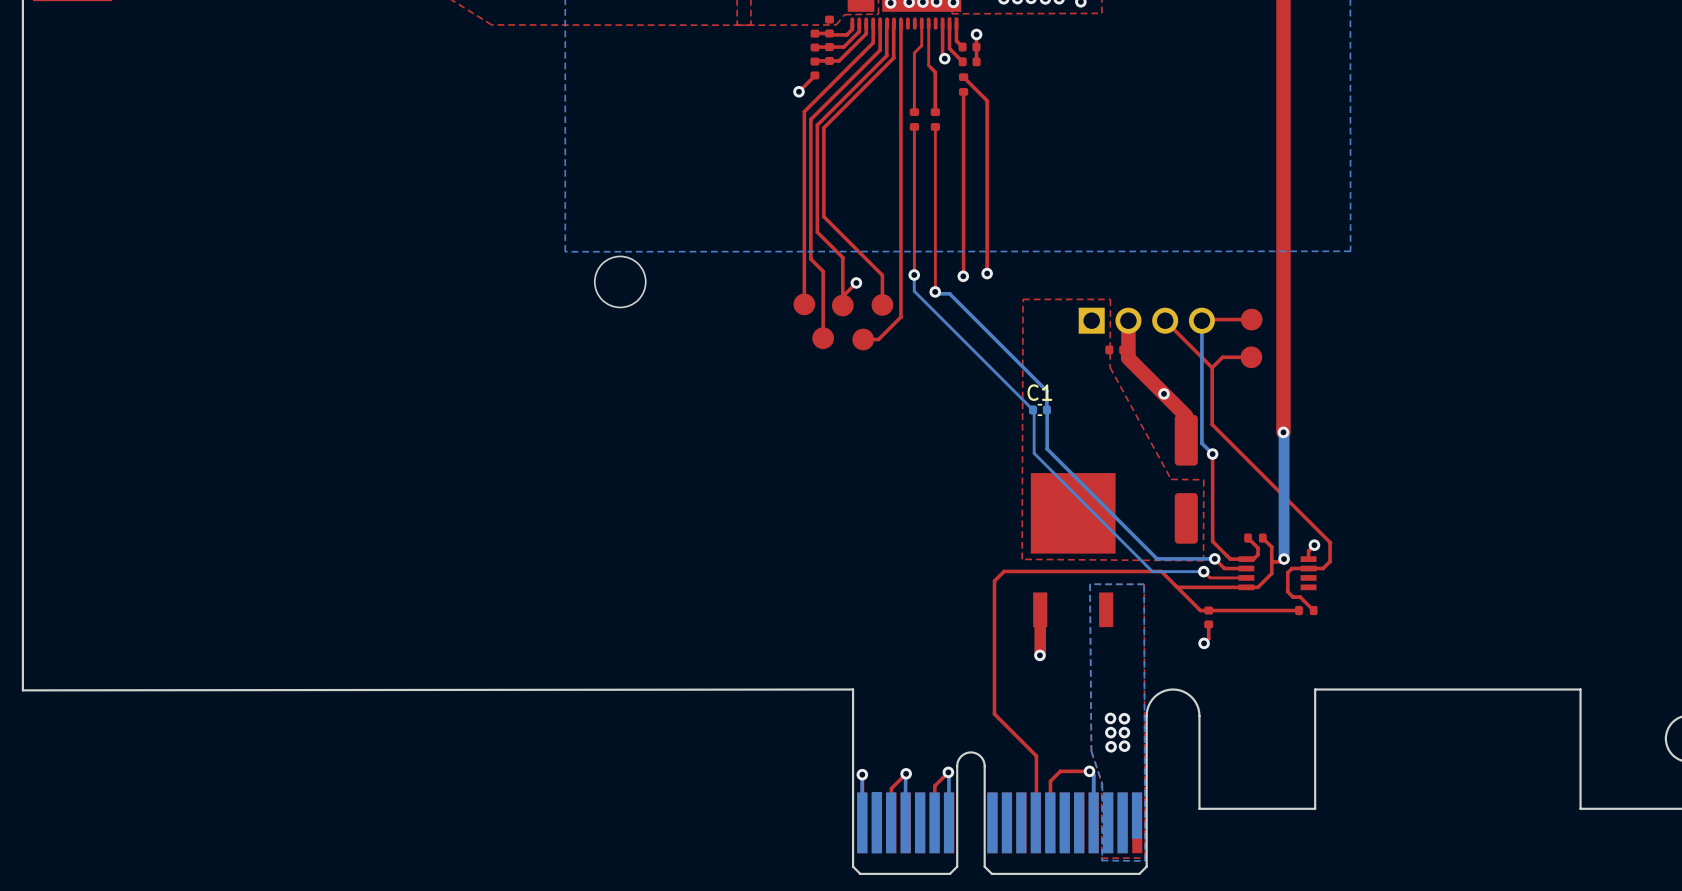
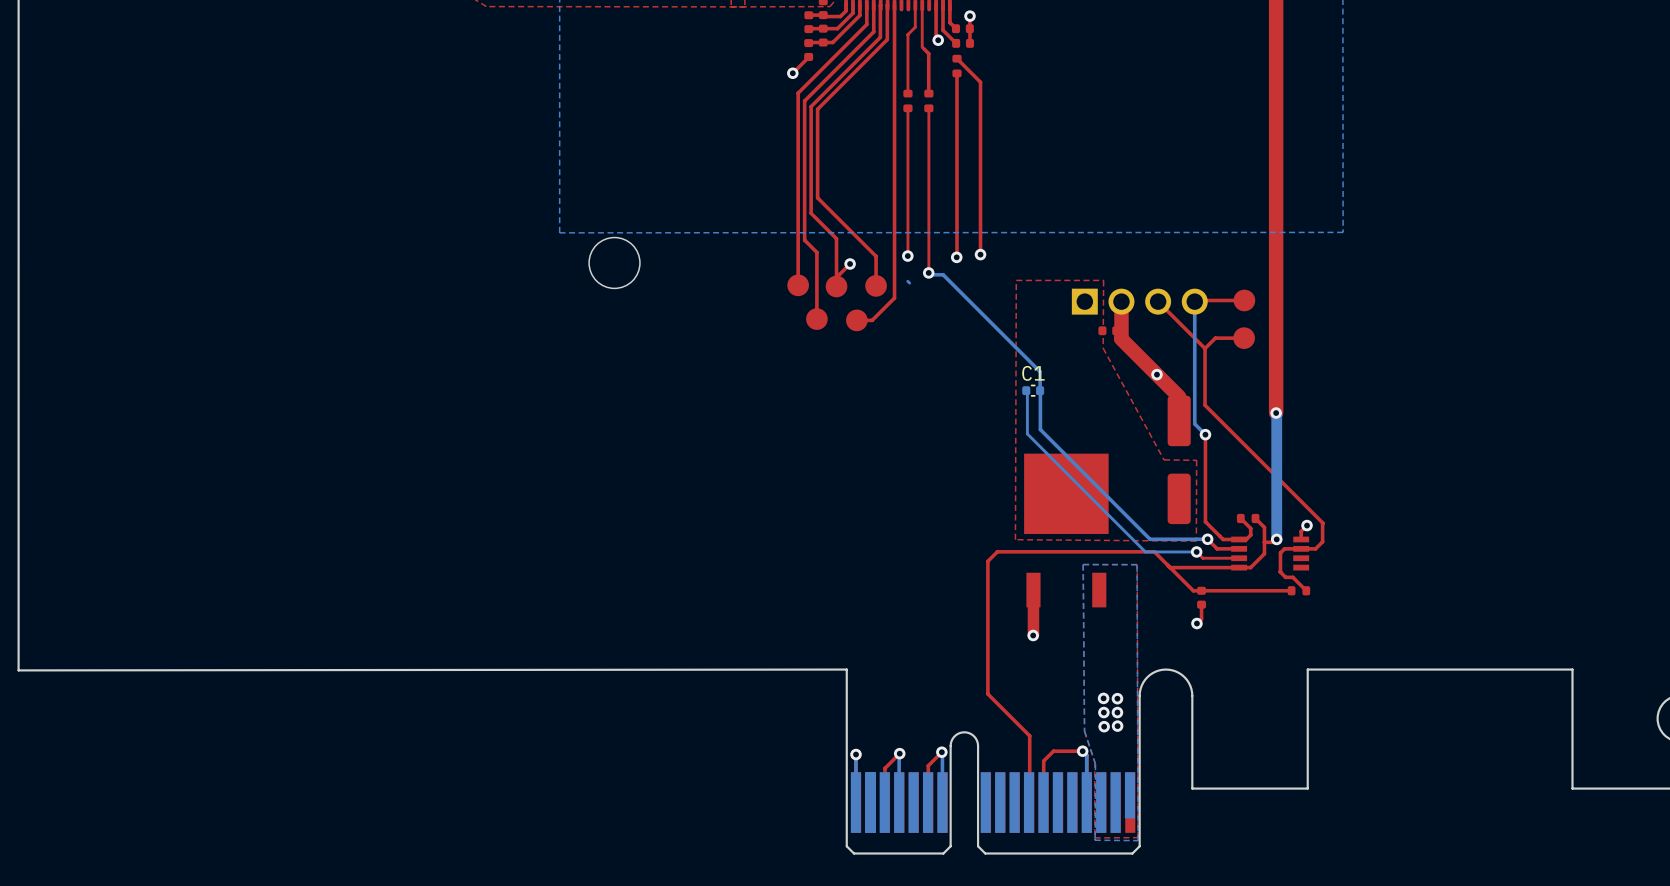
bottom track: (914, 275) (914, 291) (1032, 409) -> none
bottom track: none -> (907, 281) (909, 283)

